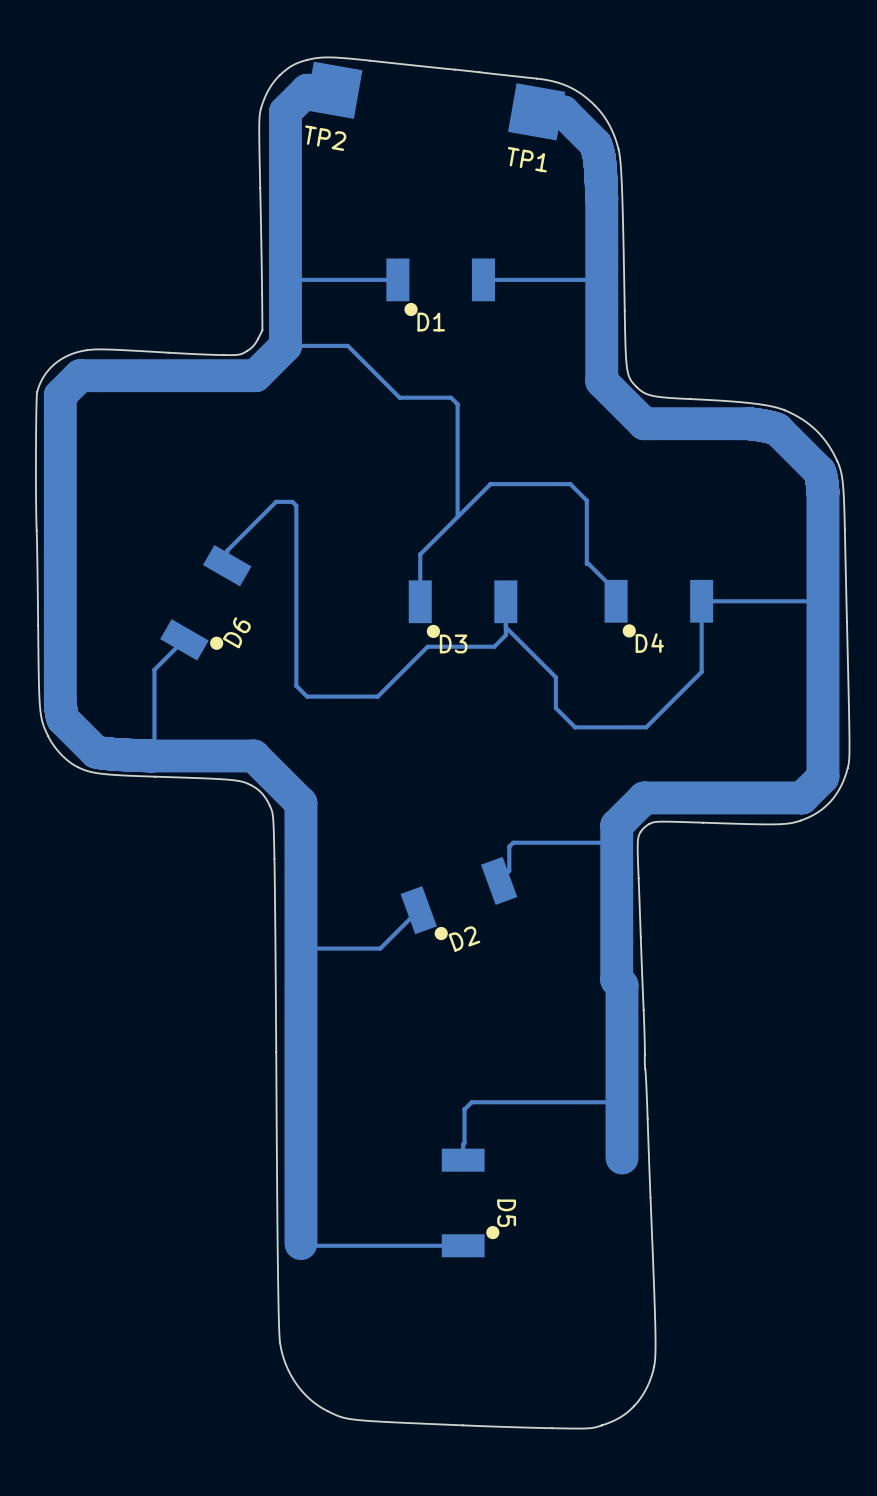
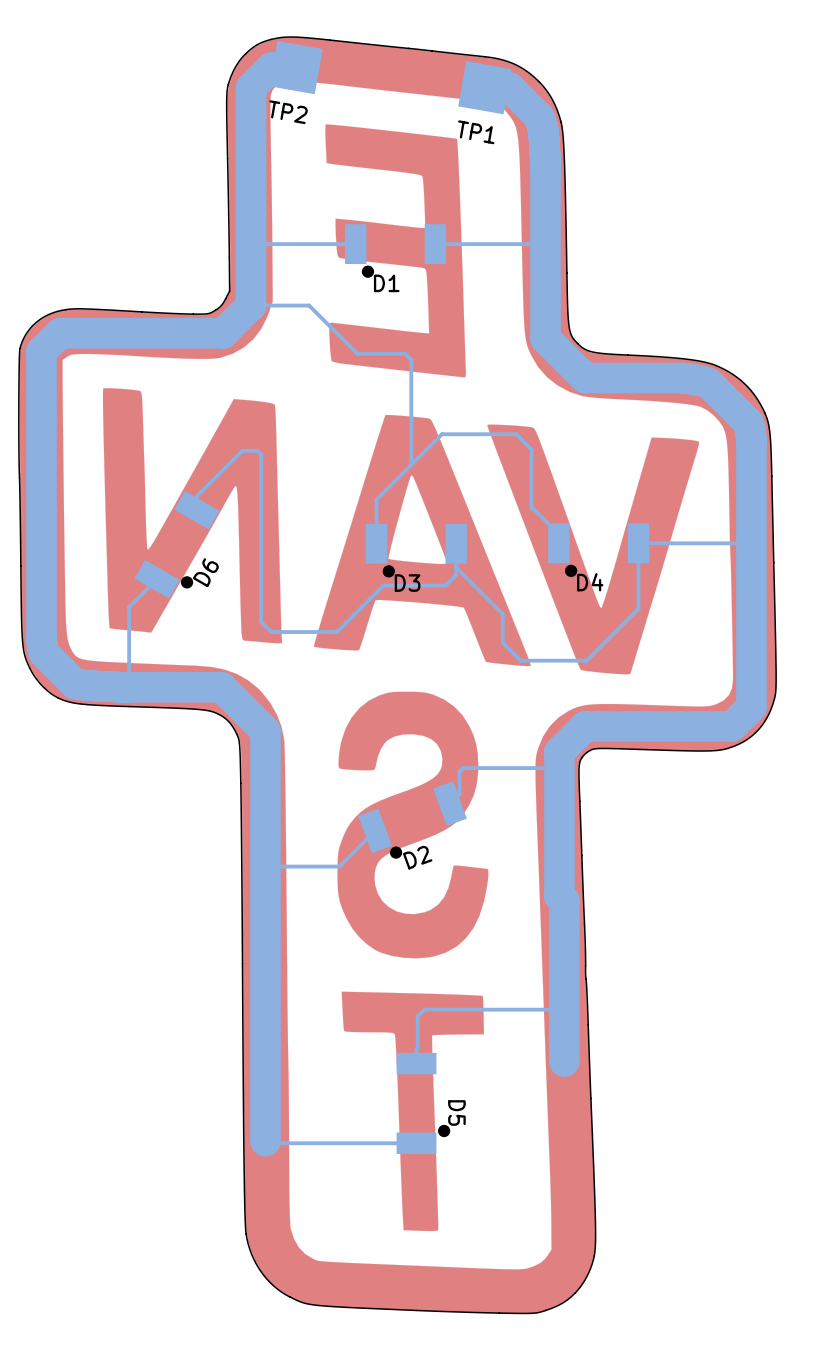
drawing: none -> [19, 37, 777, 1314]

